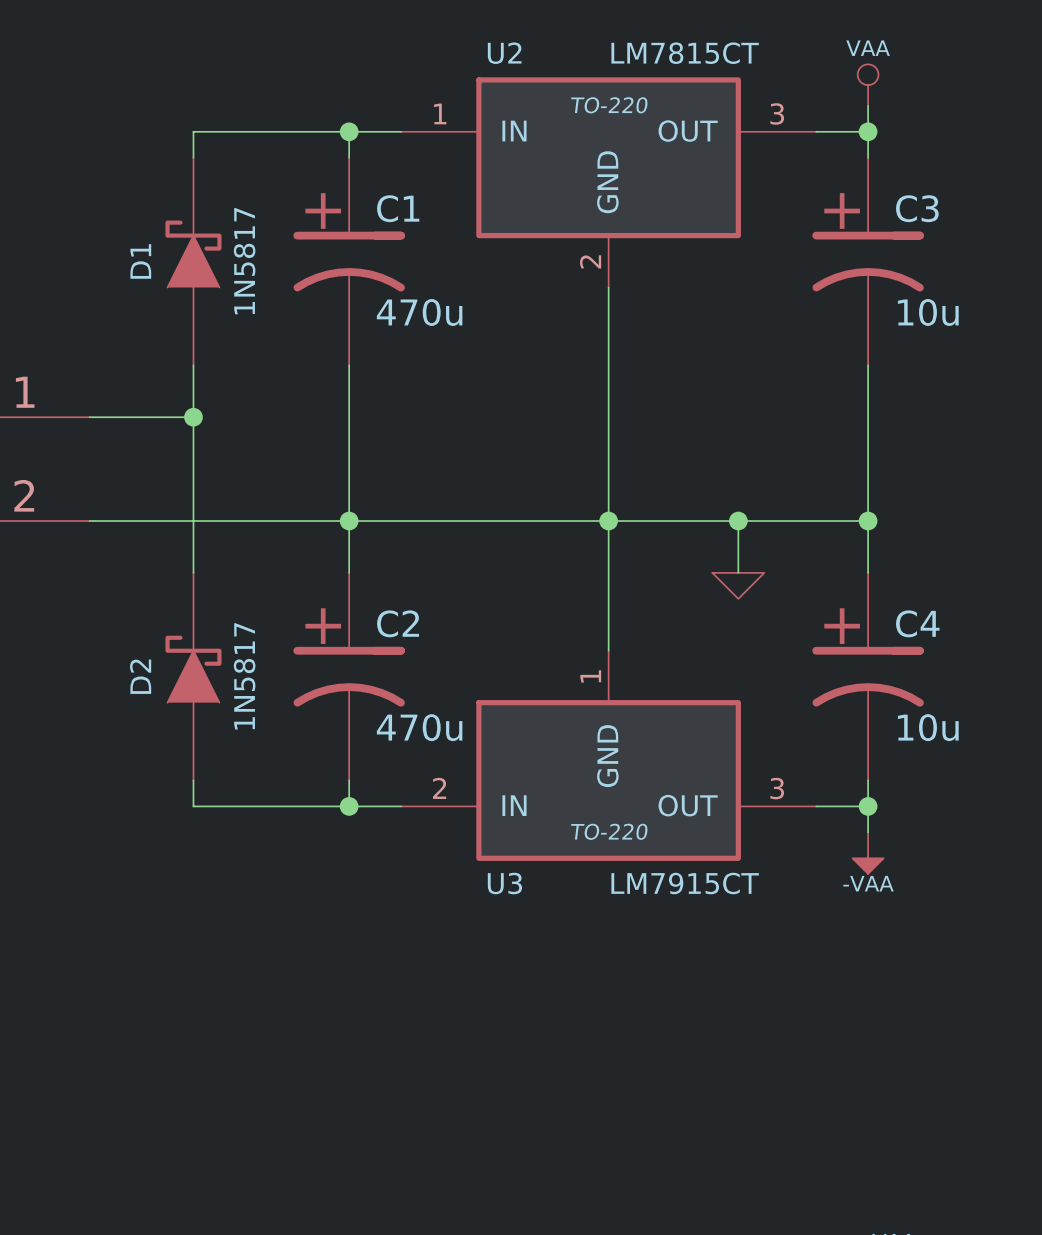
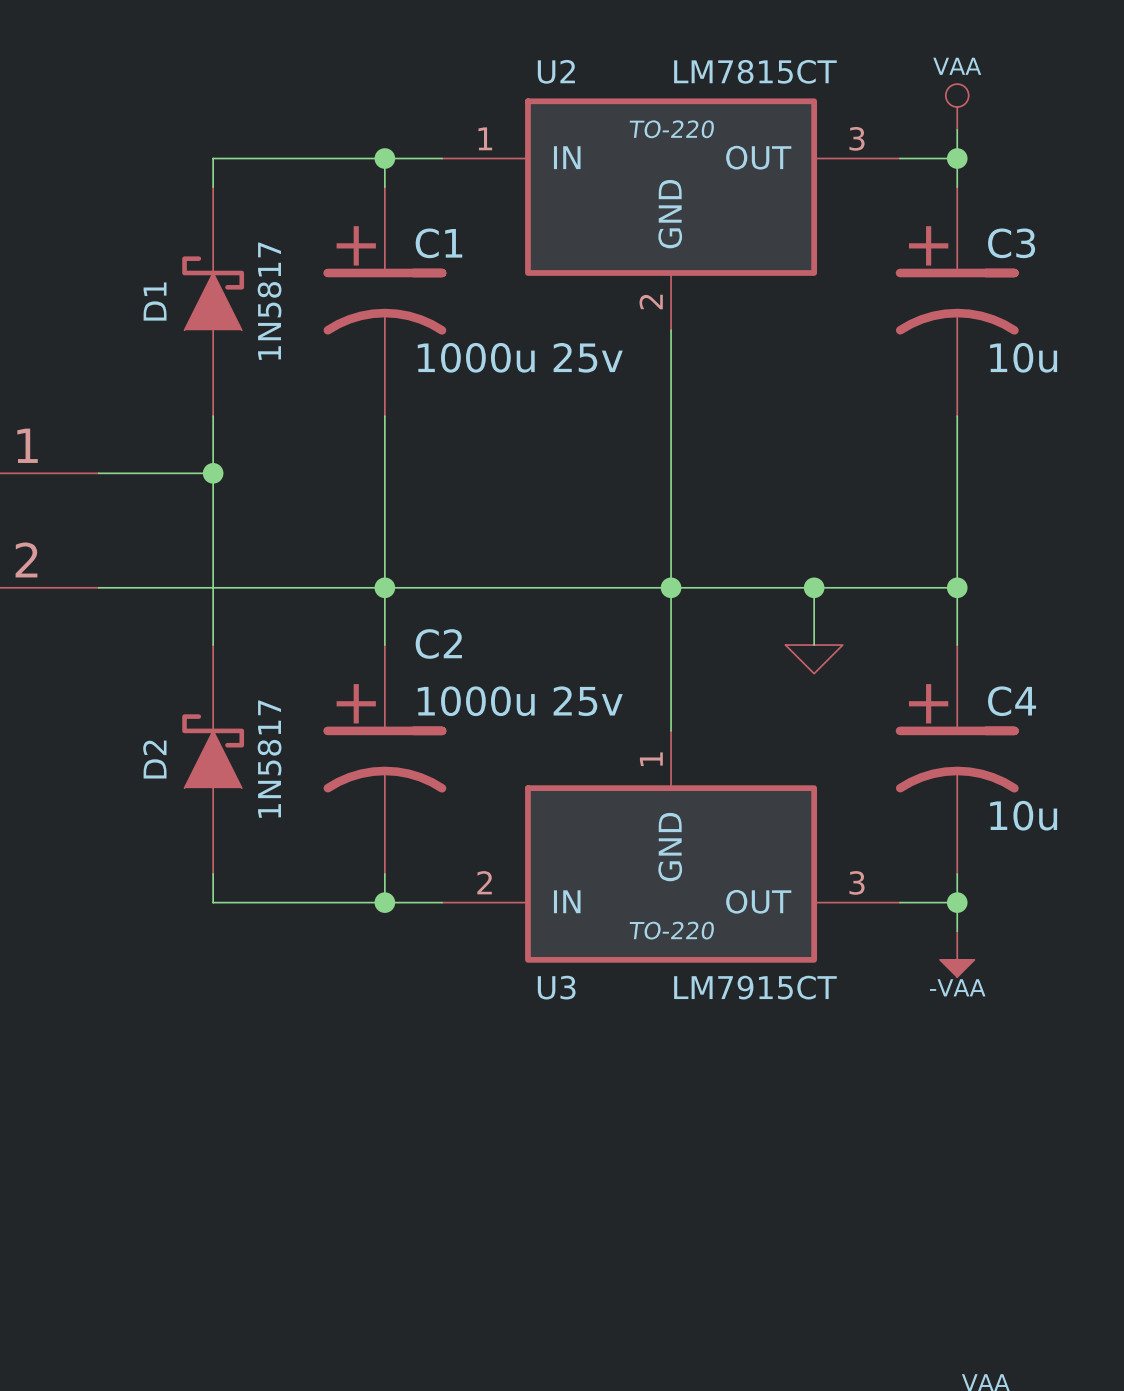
C1 value: 470u (419, 312) -> 1000u 25v (520, 357)
C2 name position: C2 (398, 623) -> C2 (438, 643)
C2 value: 470u (419, 727) -> 1000u 25v (520, 701)

